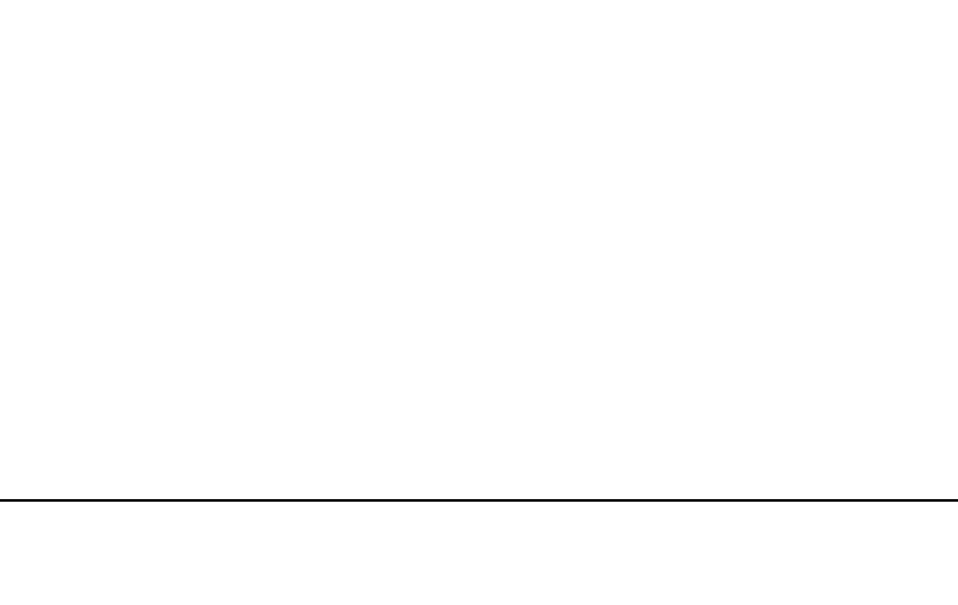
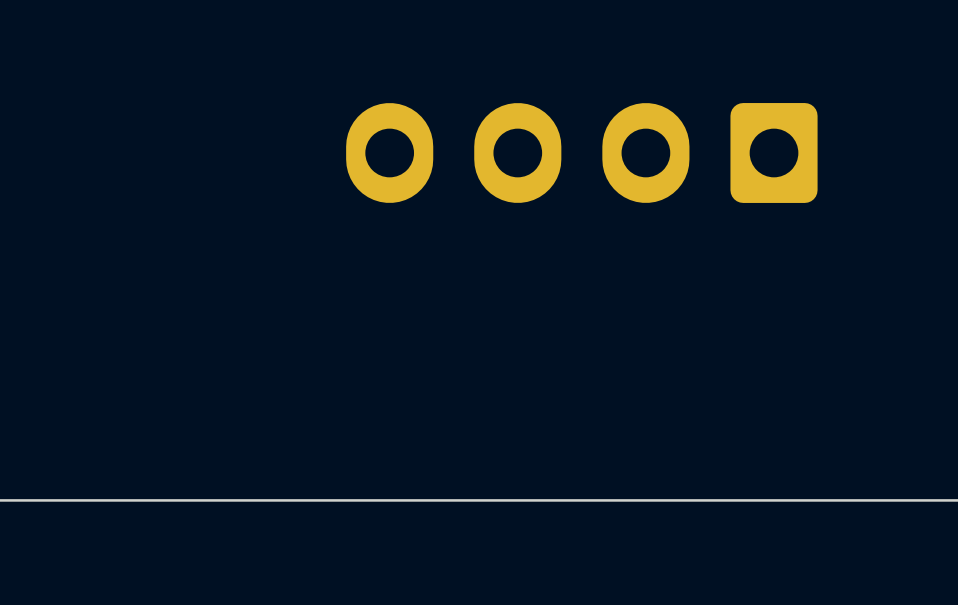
part: none -> (581, 152)

